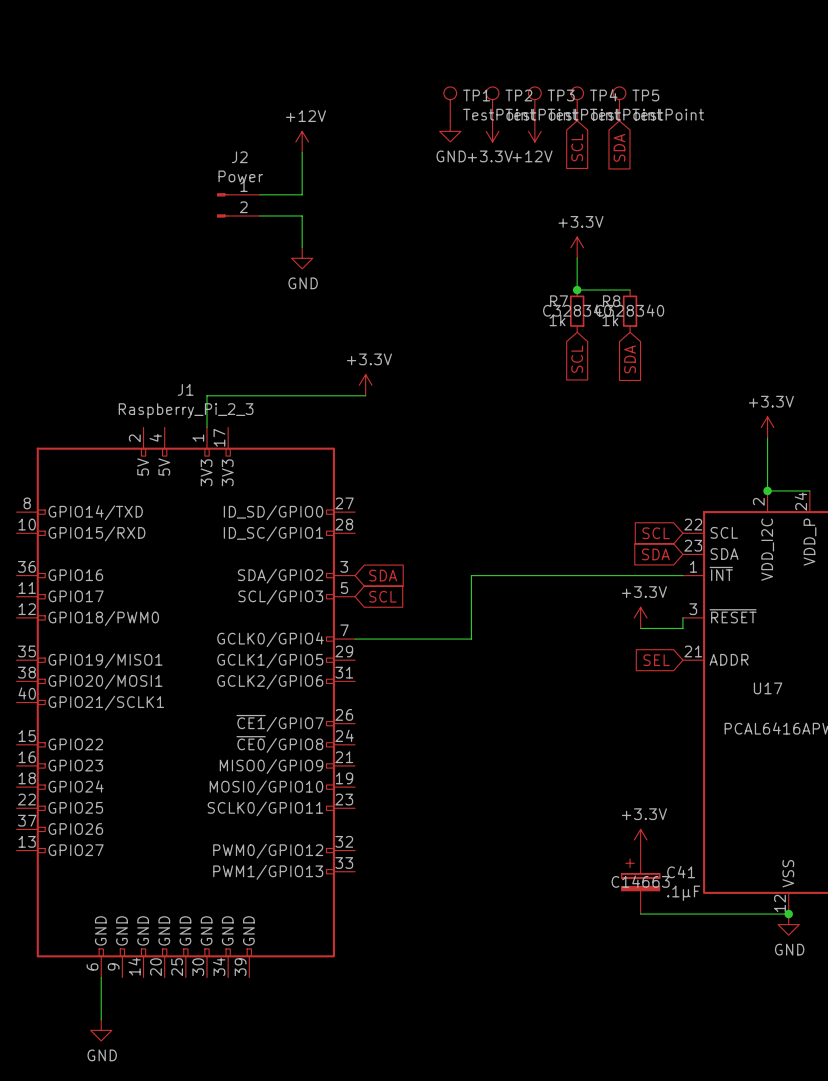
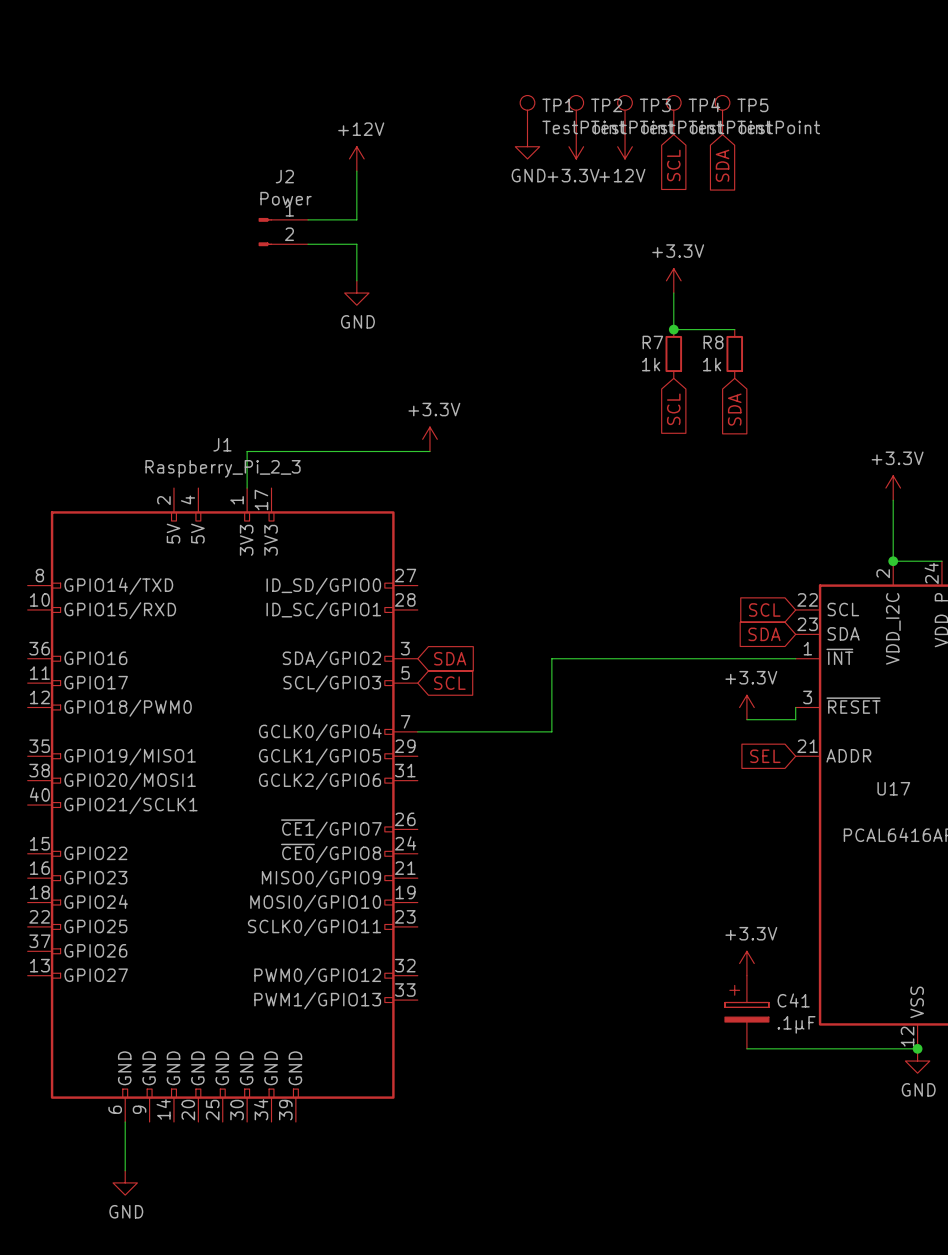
R7 text: C328340 (577, 310) -> none
R8 text: C328340 (630, 310) -> none
C41 text: C14663 (640, 881) -> none

